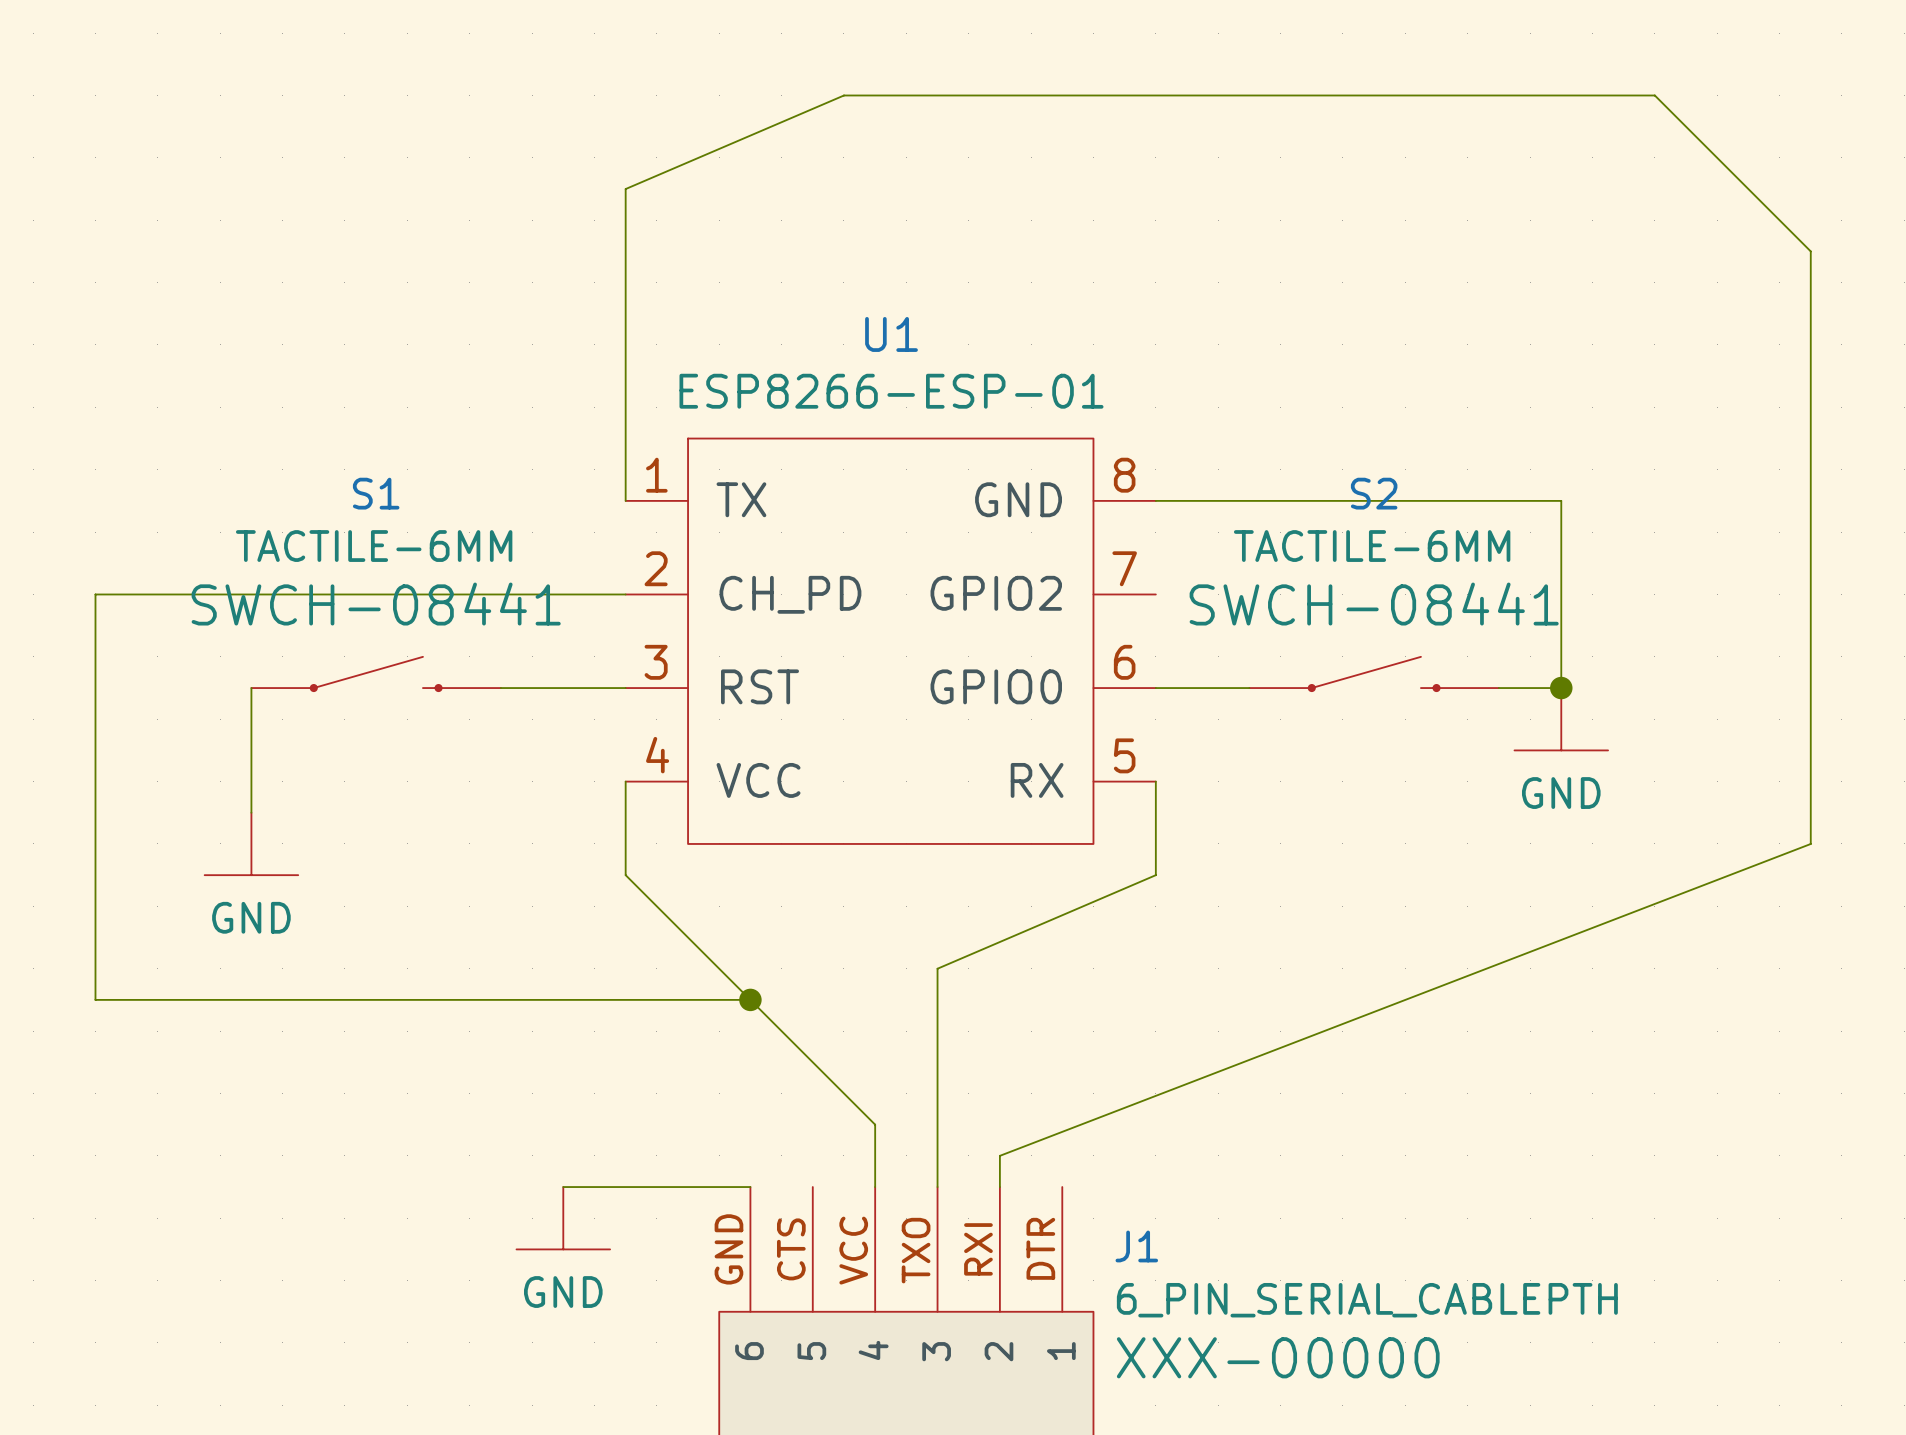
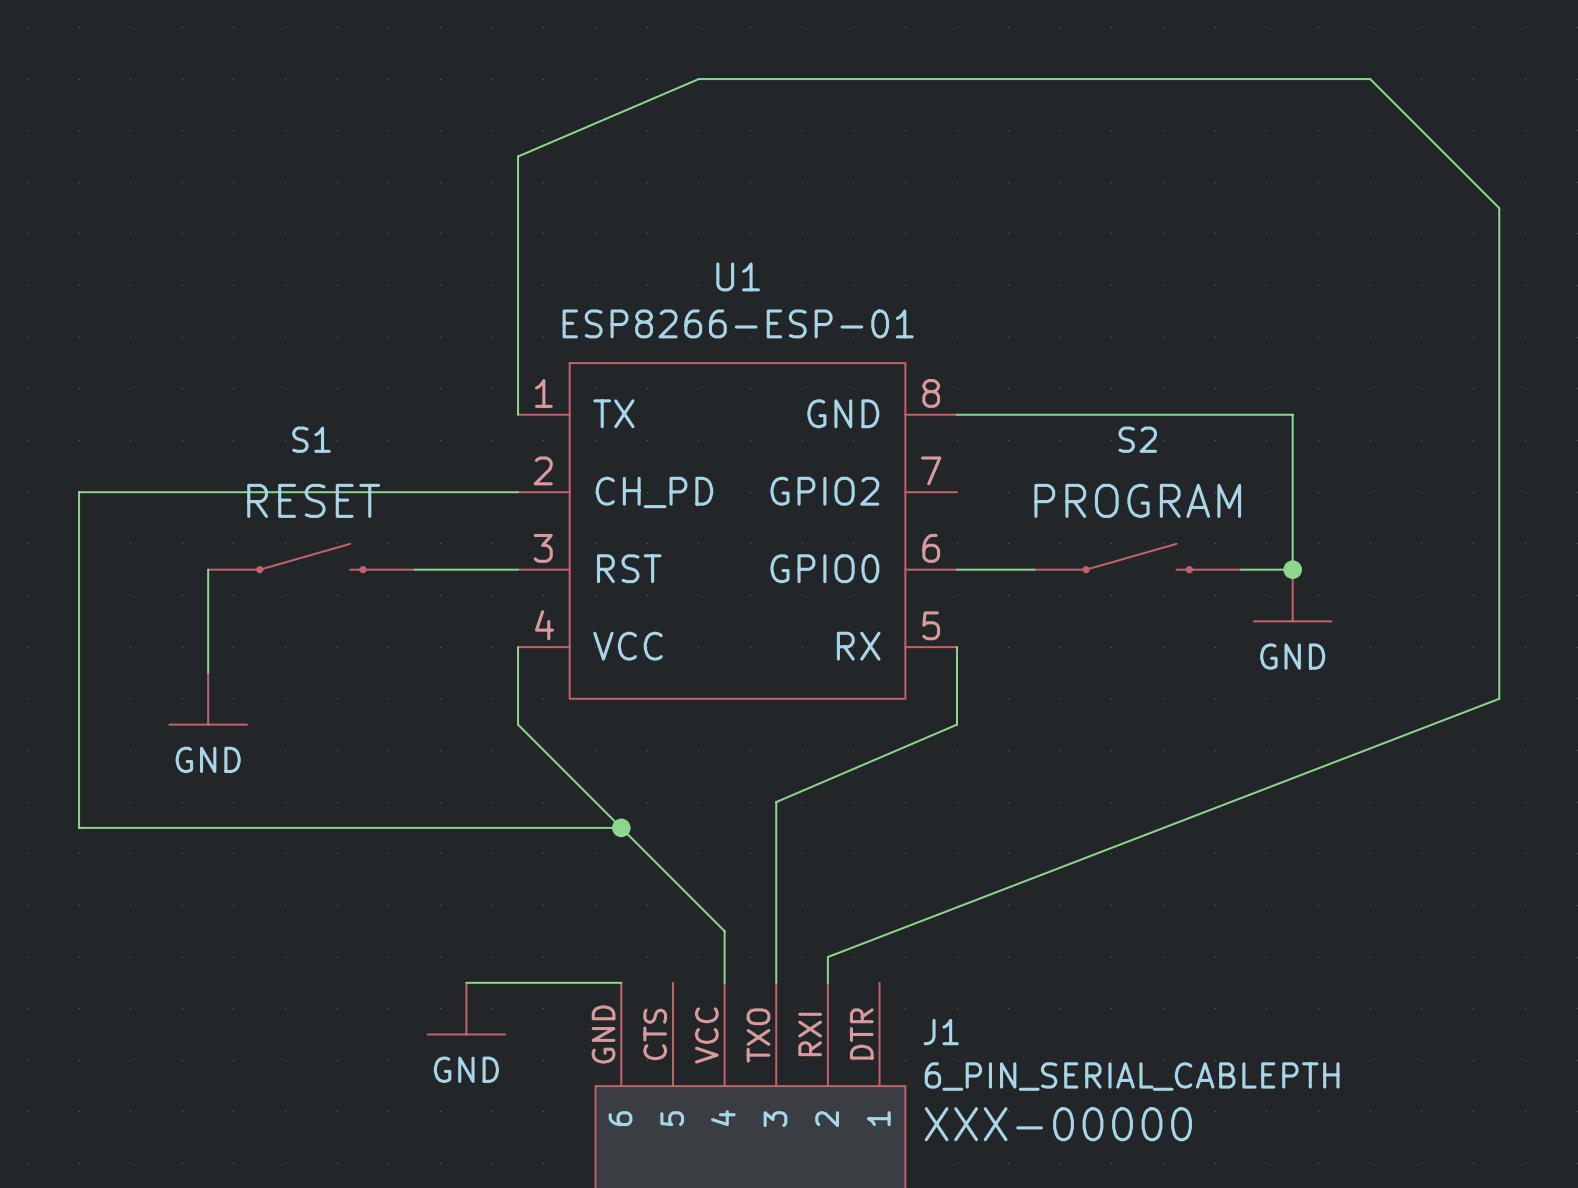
S1 name position: S1 (376, 493) -> S1 (311, 439)
S2 name position: S2 (1374, 493) -> S2 (1137, 439)
S1 value: TACTILE-6MM (374, 546) -> none
S2 value: TACTILE-6MM (1372, 546) -> none
S1 text: SWCH-08441 (376, 604) -> RESET (313, 500)
S2 text: SWCH-08441 (1374, 604) -> PROGRAM (1137, 500)

